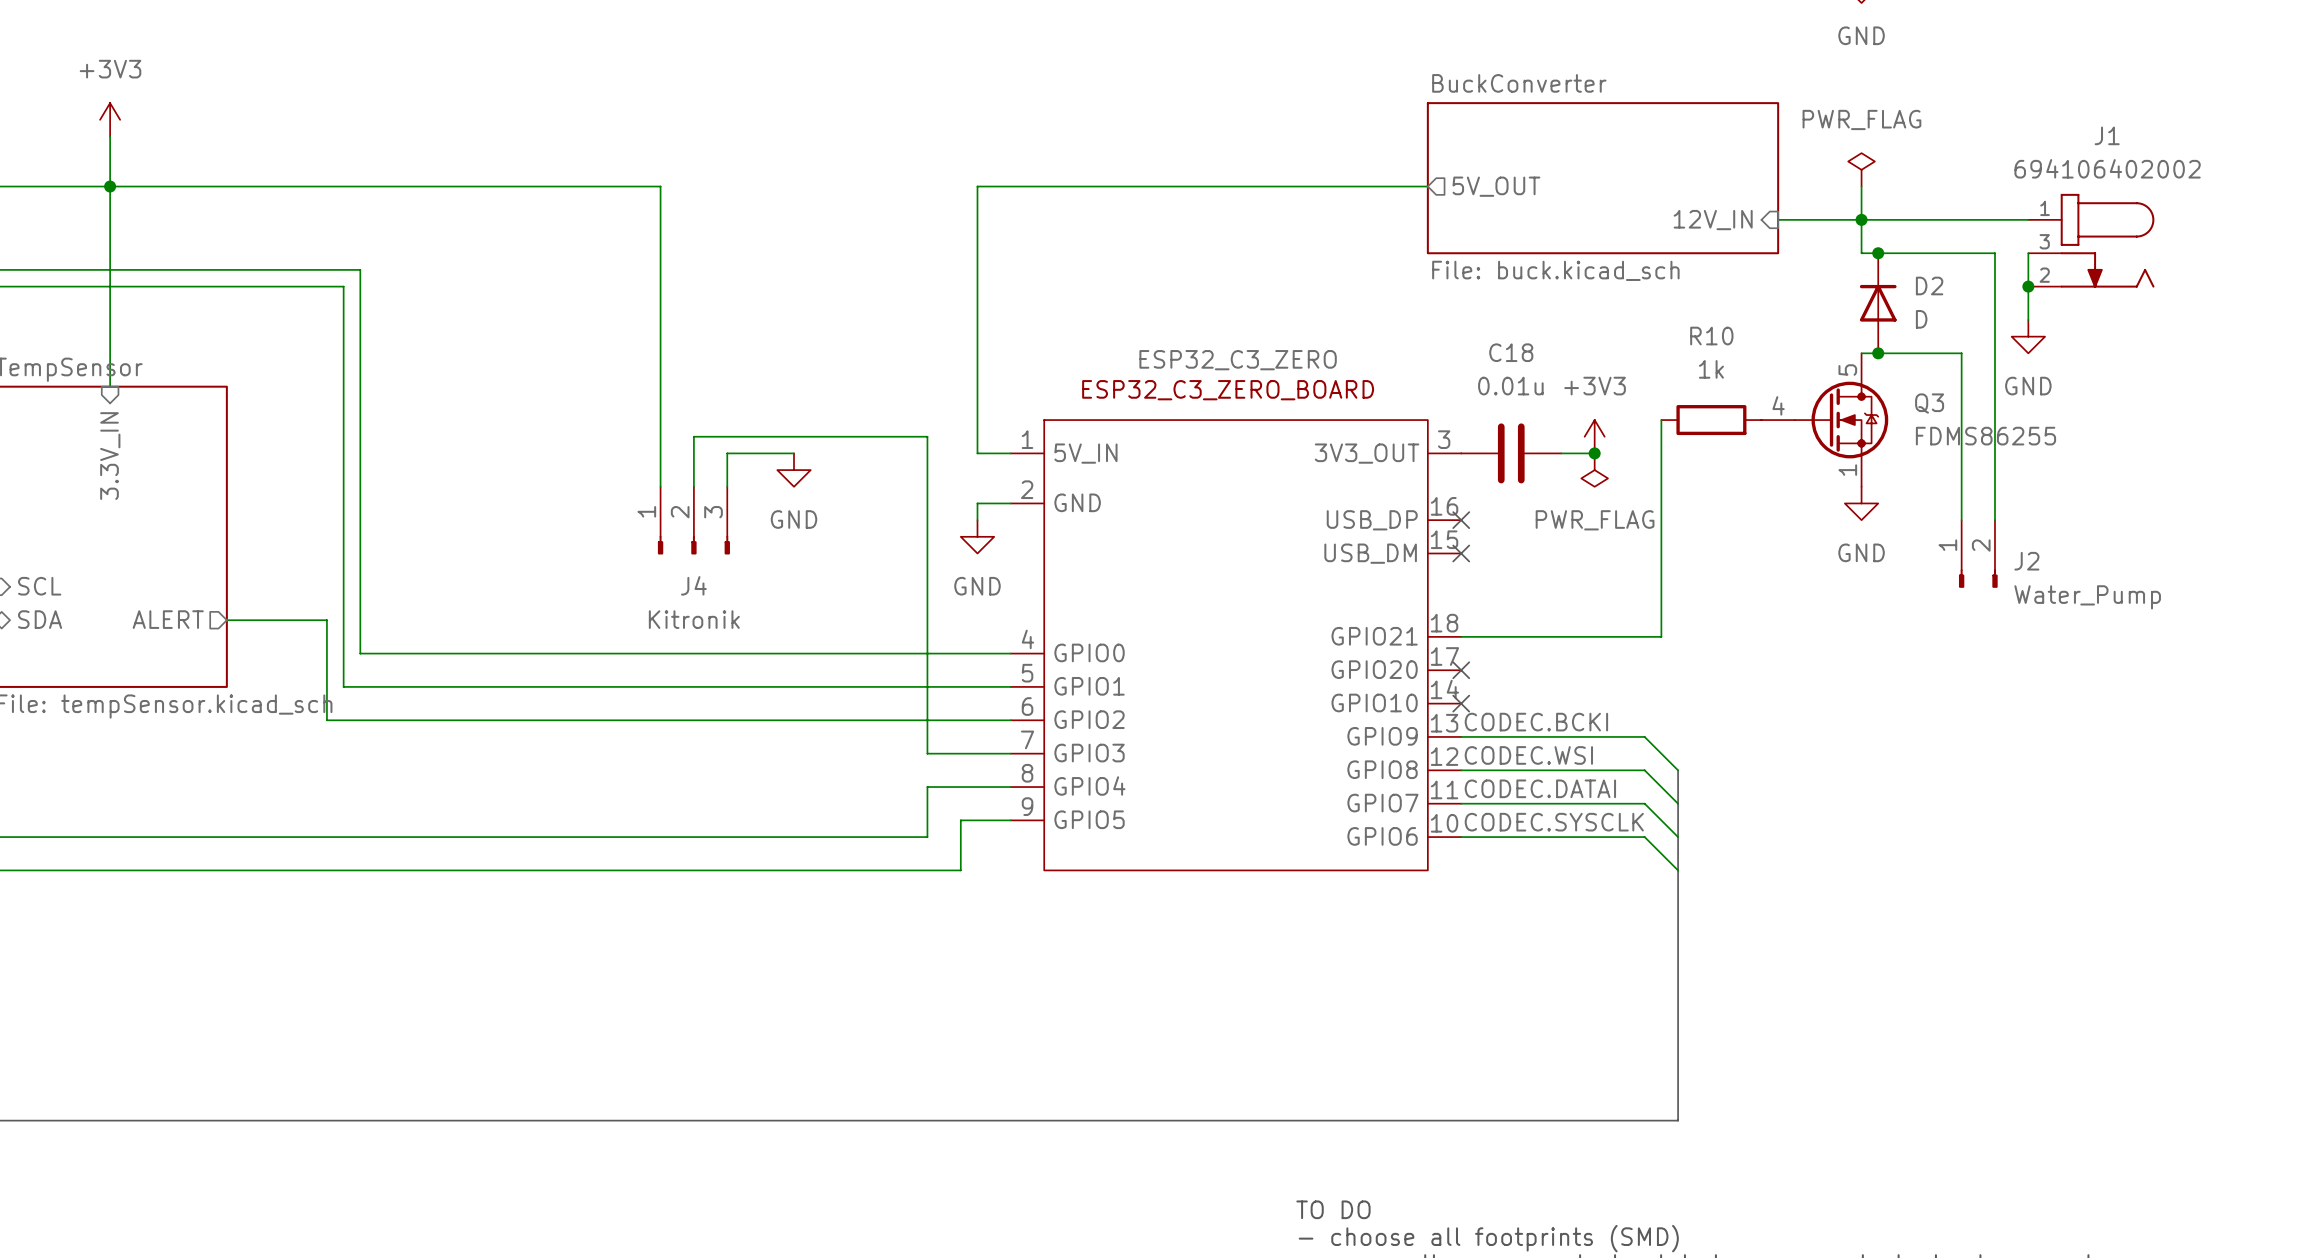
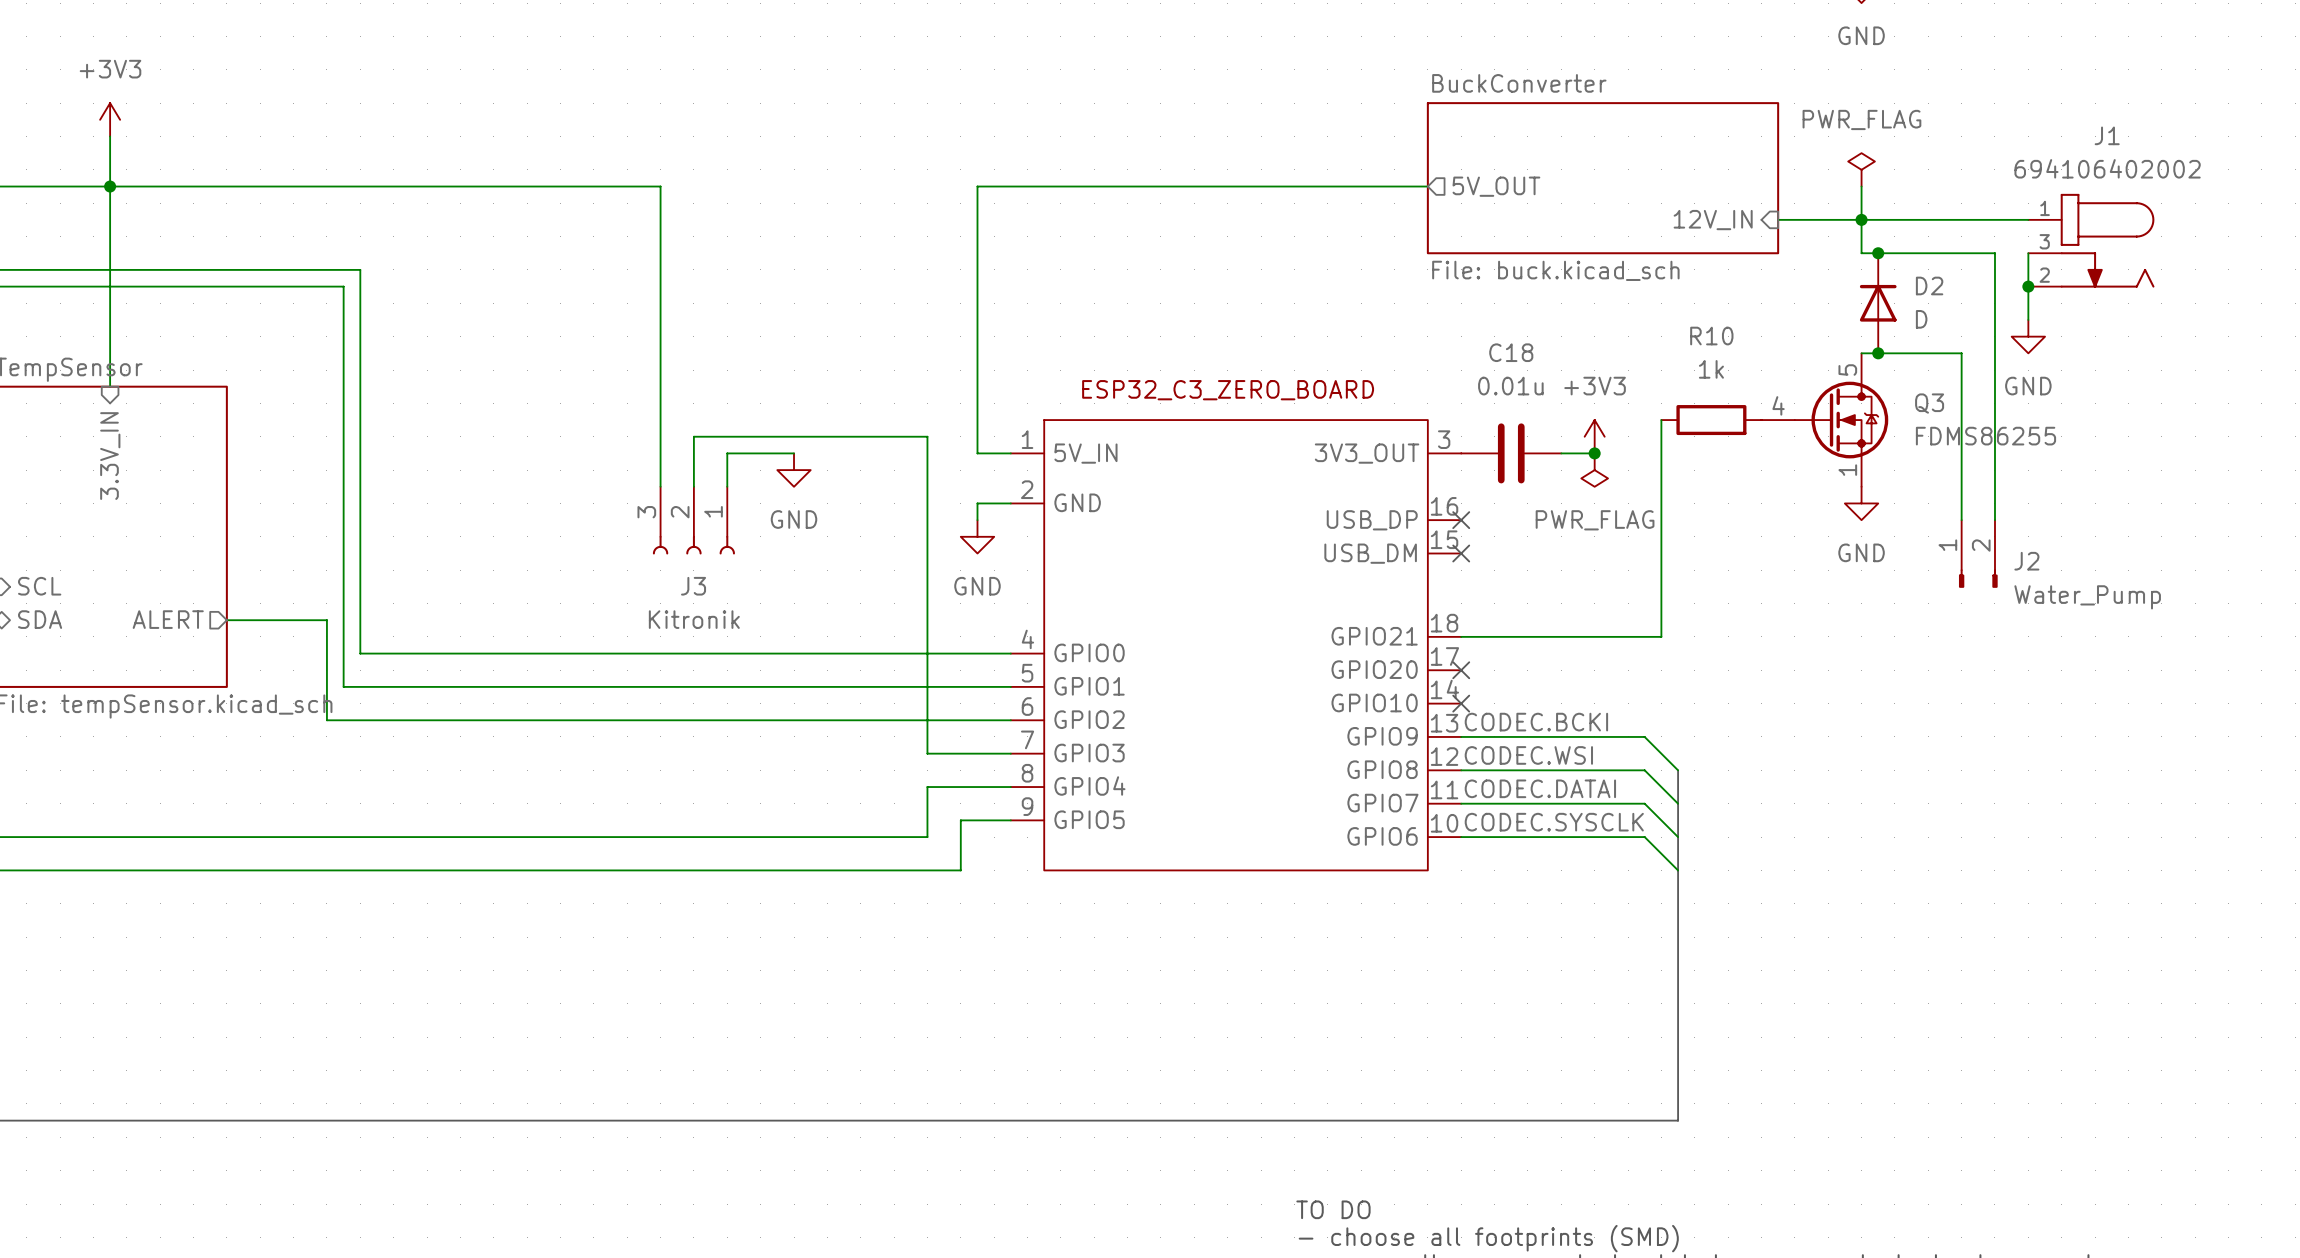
part value: ESP32_C3_ZERO (1238, 360) -> none
J4: Kitronik (693, 520) -> none
J3: none -> Kitronik (693, 520)

